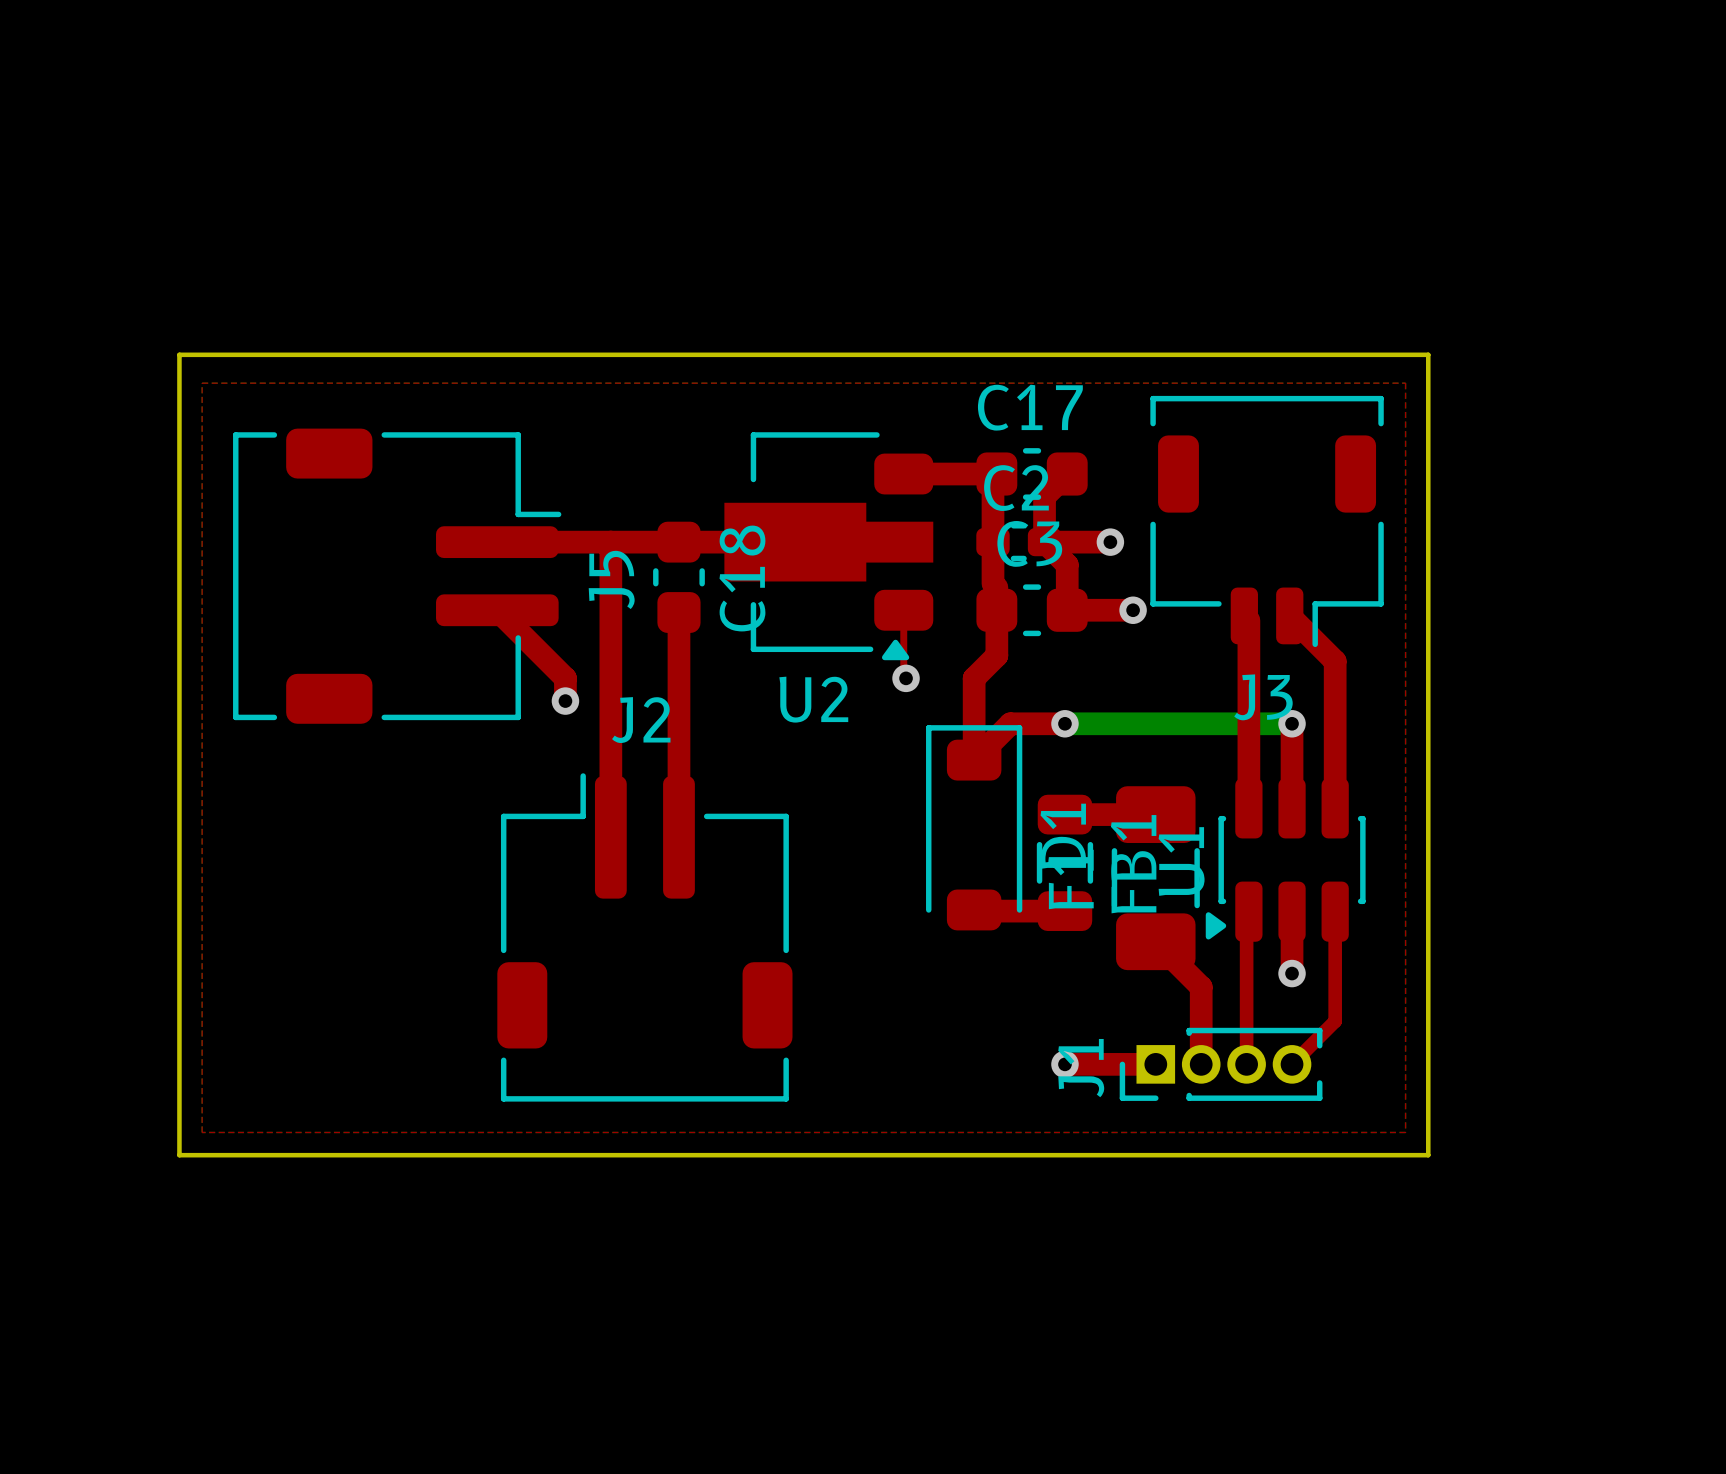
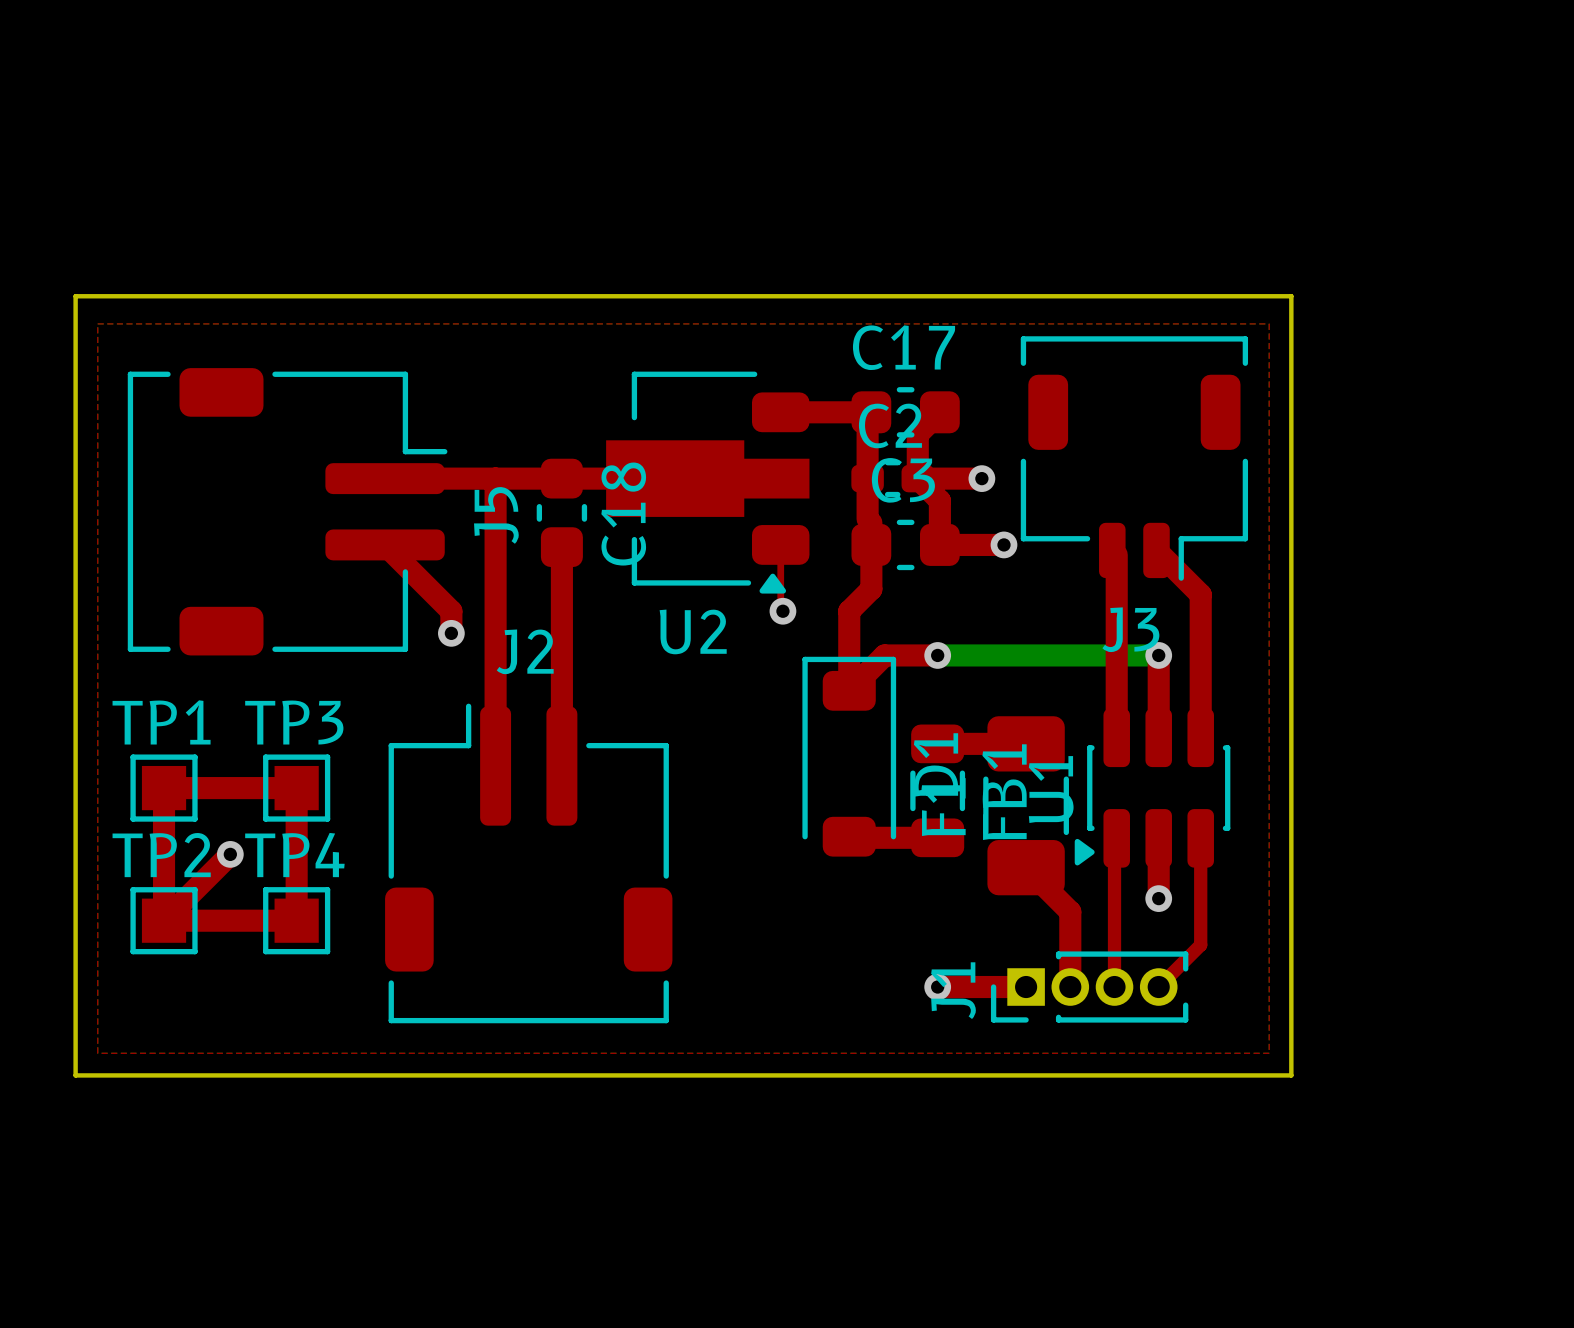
TP1: none -> (164, 788)
TP3: none -> (296, 788)
top track: none -> (230, 854) (164, 920)
via: none -> (230, 854)
top track: none -> (164, 920) (164, 788) (296, 788) (296, 920) (164, 920)
TP2: none -> (164, 920)
TP4: none -> (296, 920)

